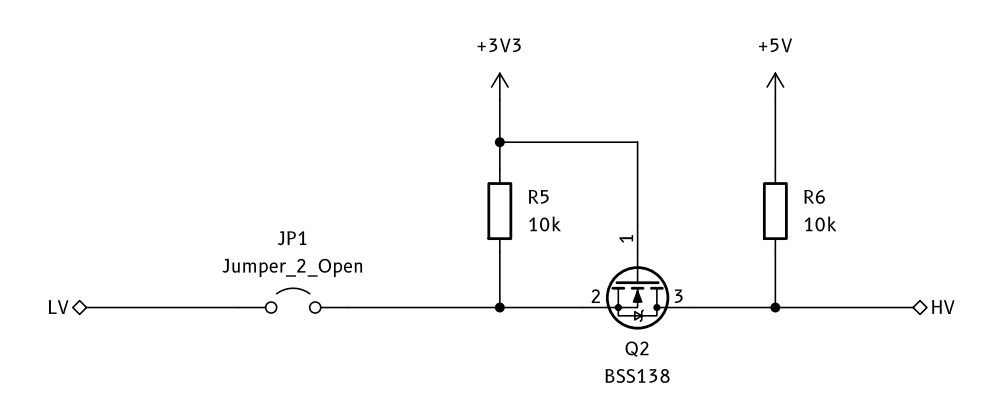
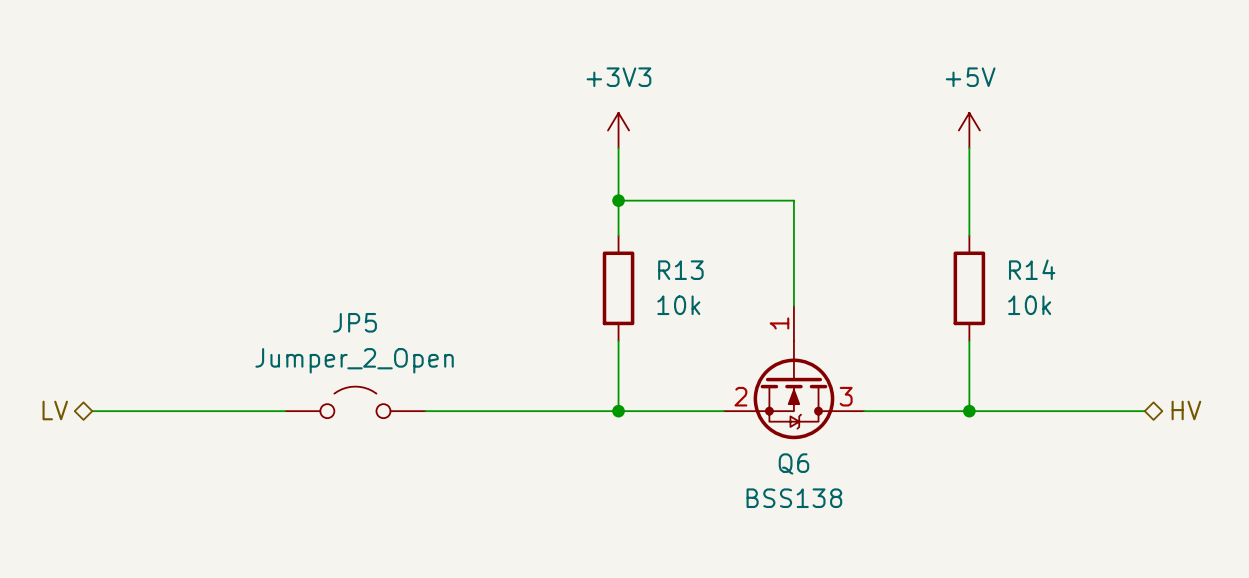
R5 name: R5 (538, 196) -> R13 (680, 270)
R6 name: R6 (814, 196) -> R14 (1032, 269)
JP1 name: JP1 (292, 238) -> JP5 (354, 322)
Q2 name: Q2 (637, 349) -> Q6 (793, 463)

